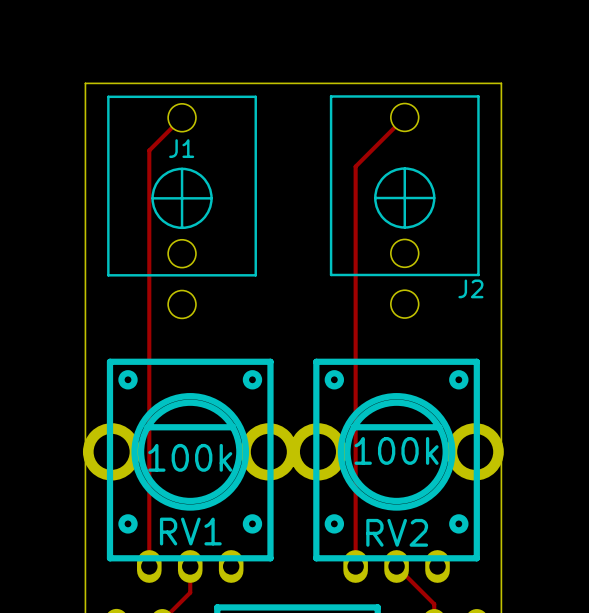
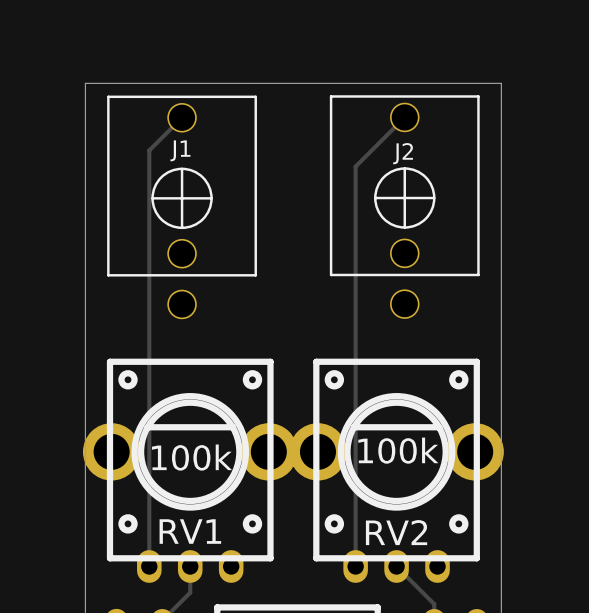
J2 name position: J2 (470, 288) -> J2 (403, 153)

